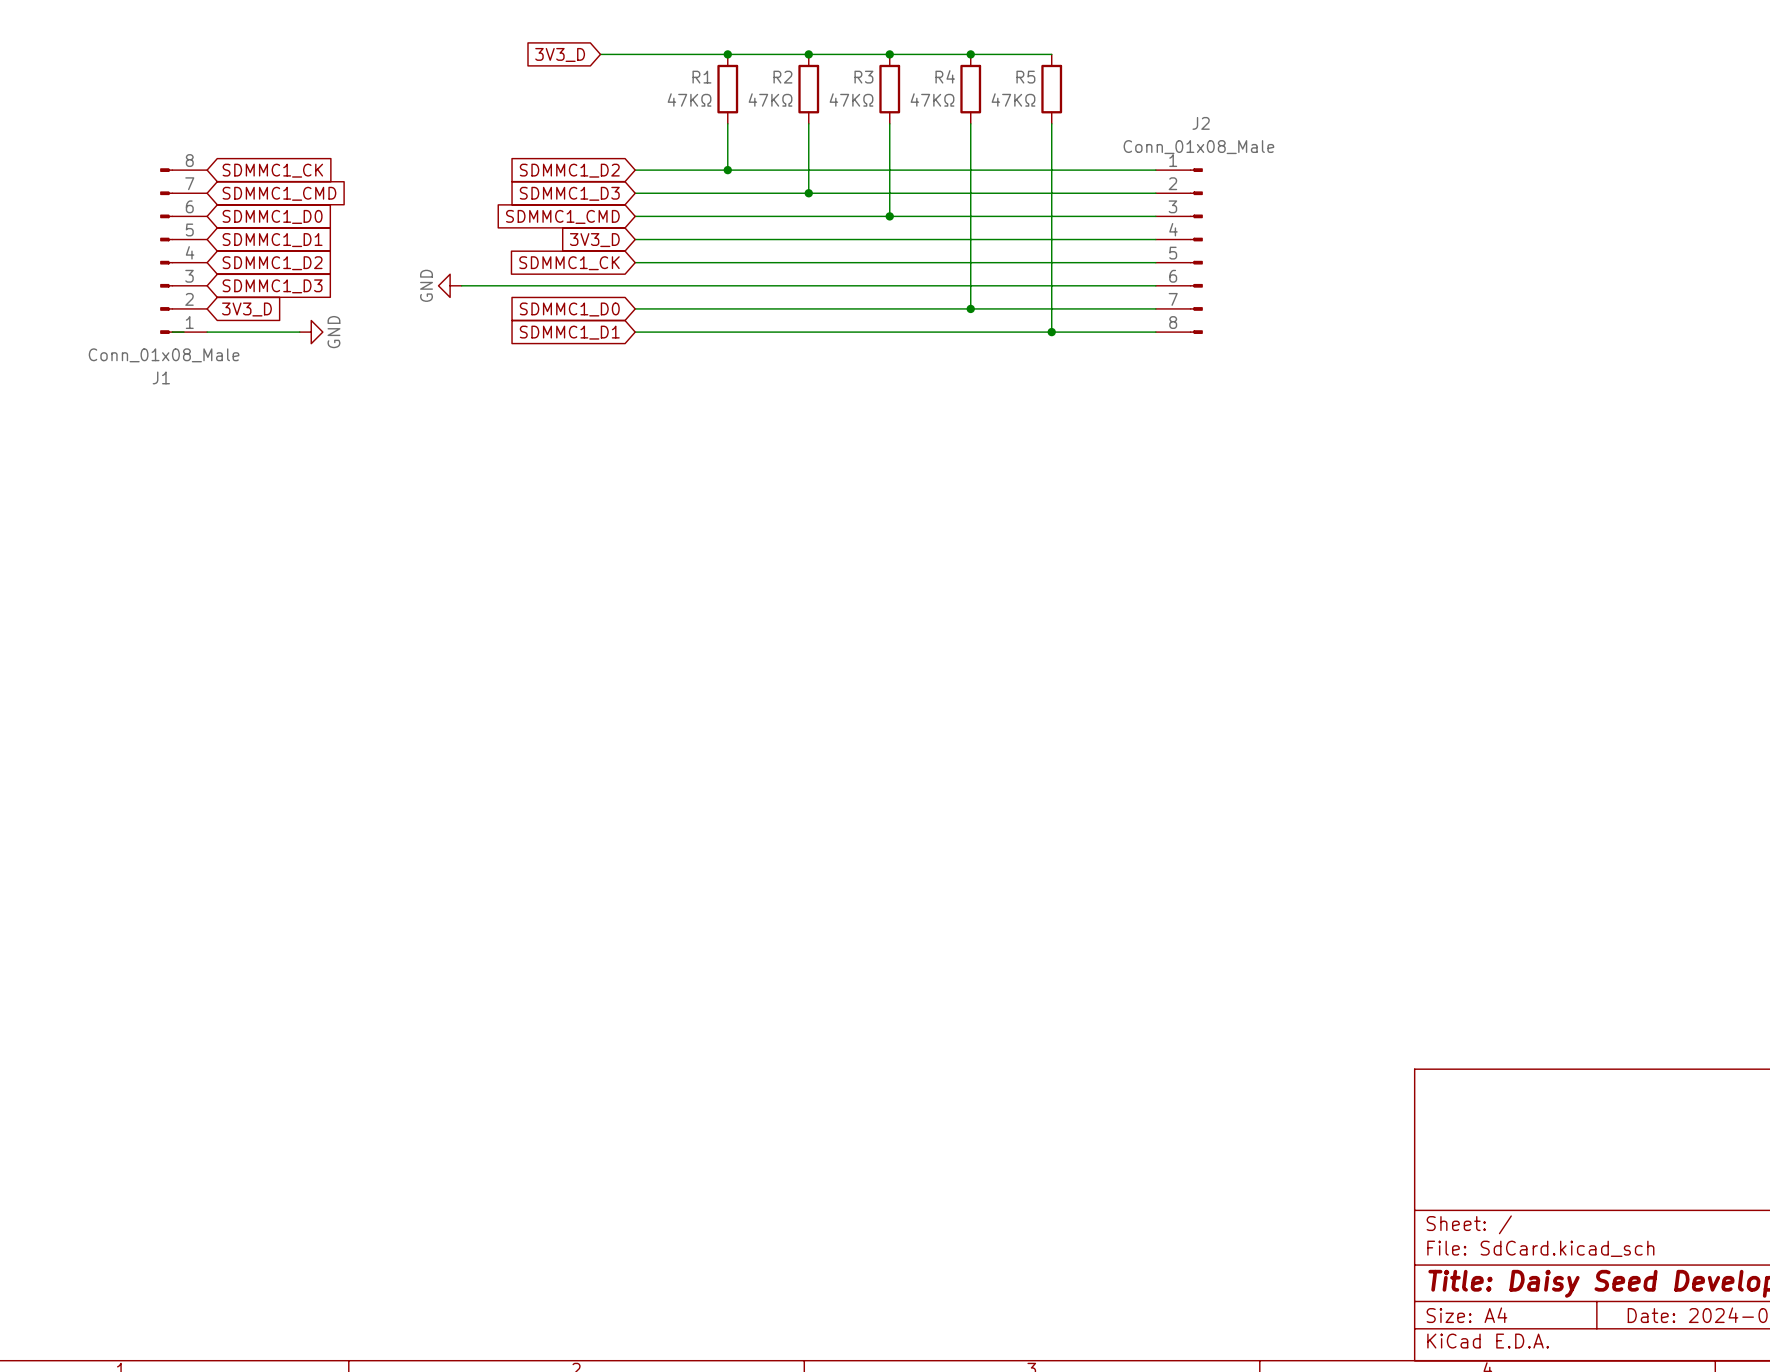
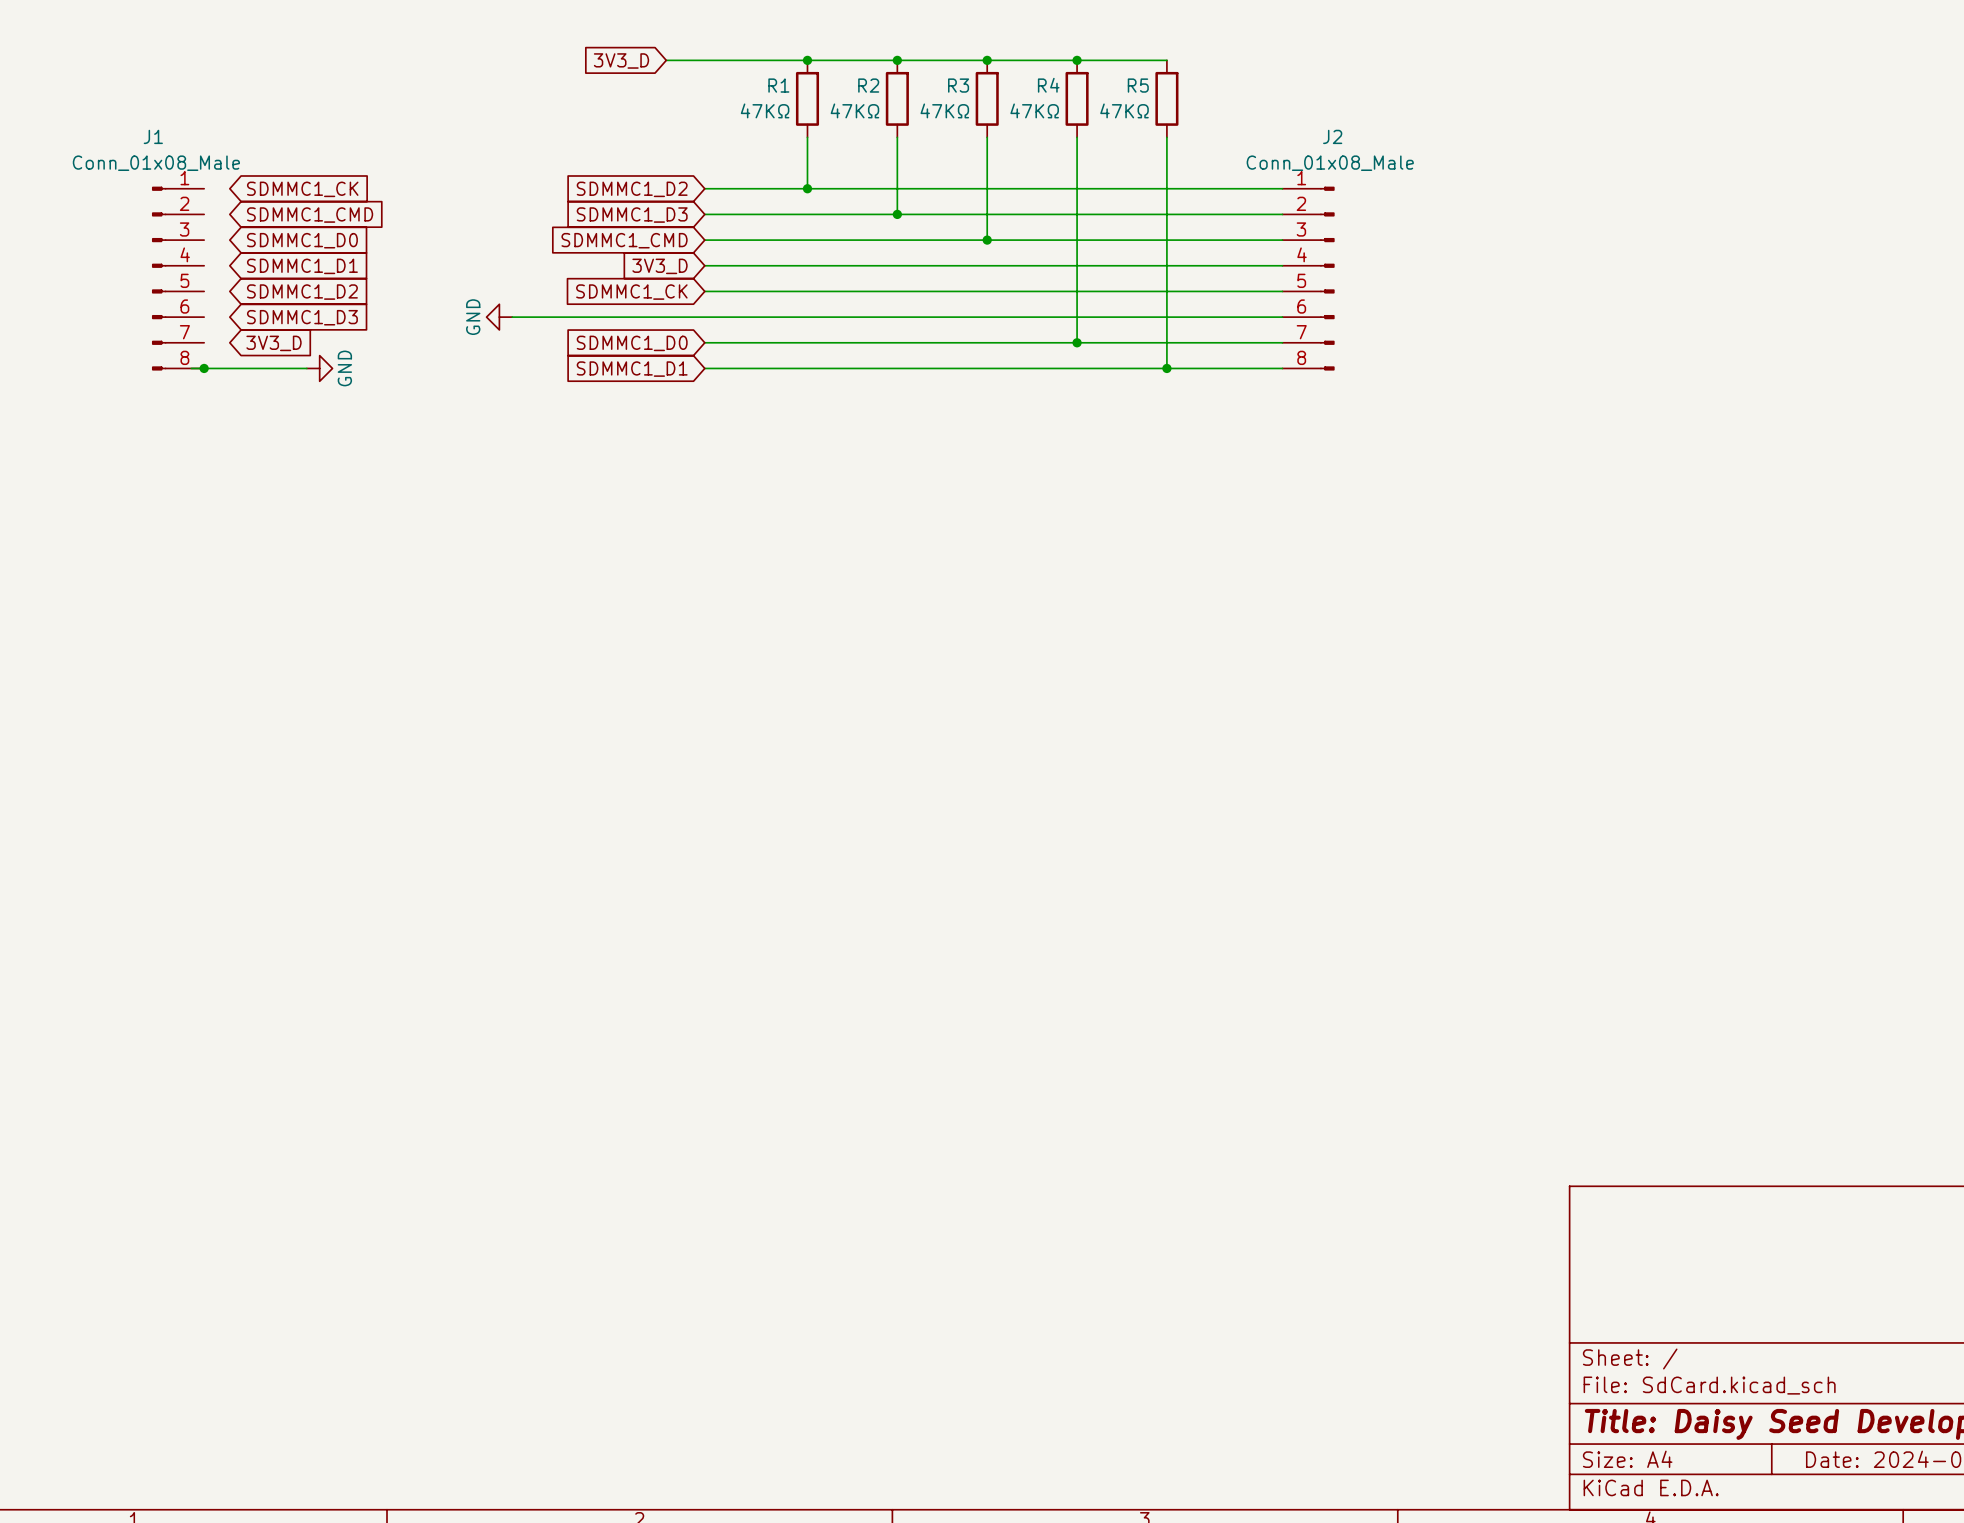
J1 flip: as is (166, 251) -> up-down (159, 278)
junction: none -> (204, 368)
power symbol position: GND (311, 332) -> GND (319, 368)

